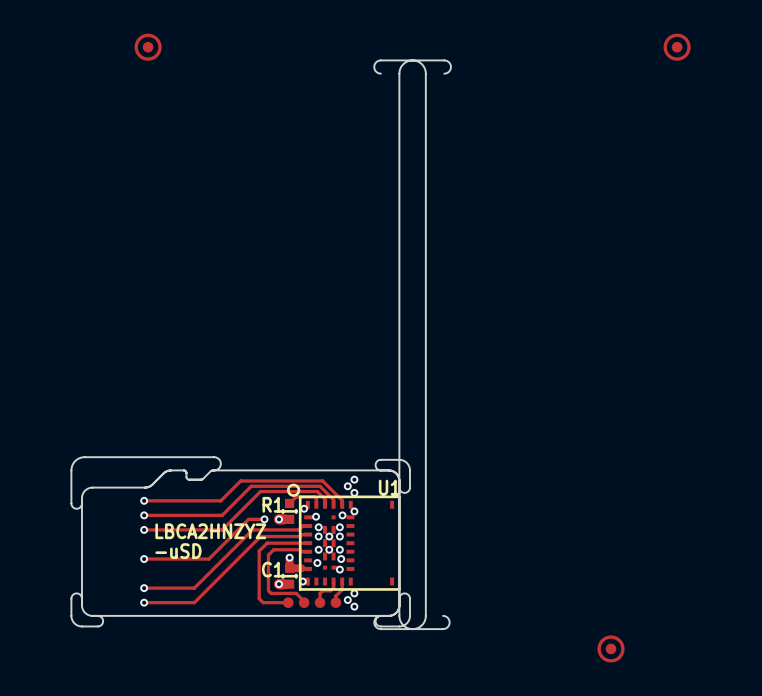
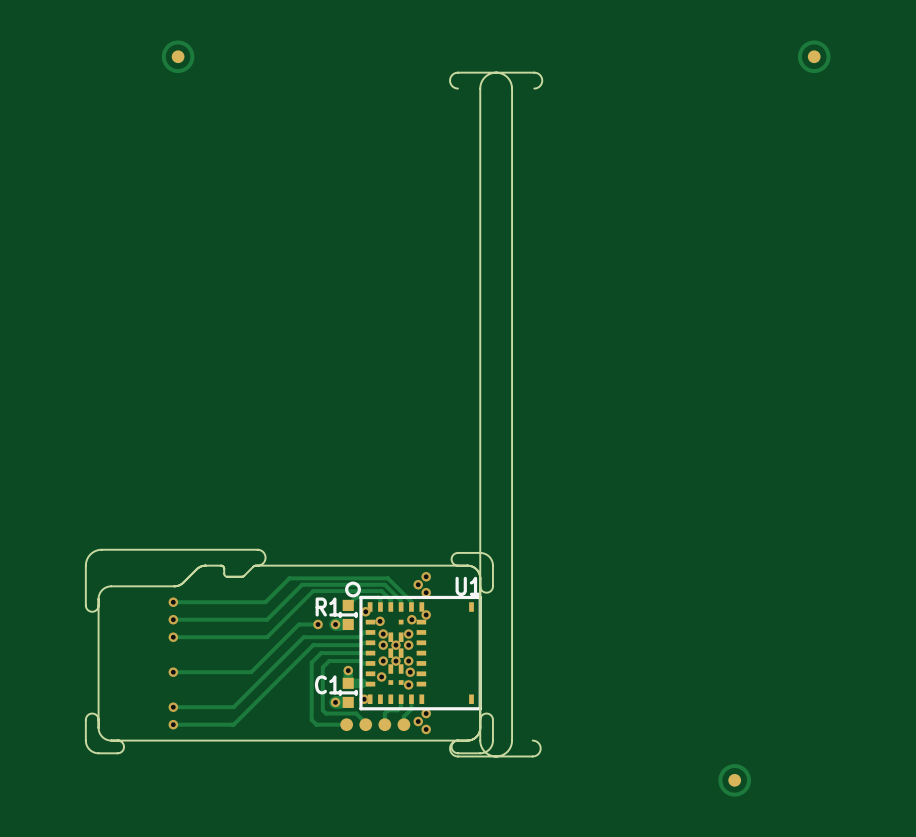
text: LBCA2HNZYZ (210, 531) -> none
text: -uSD (178, 551) -> none

